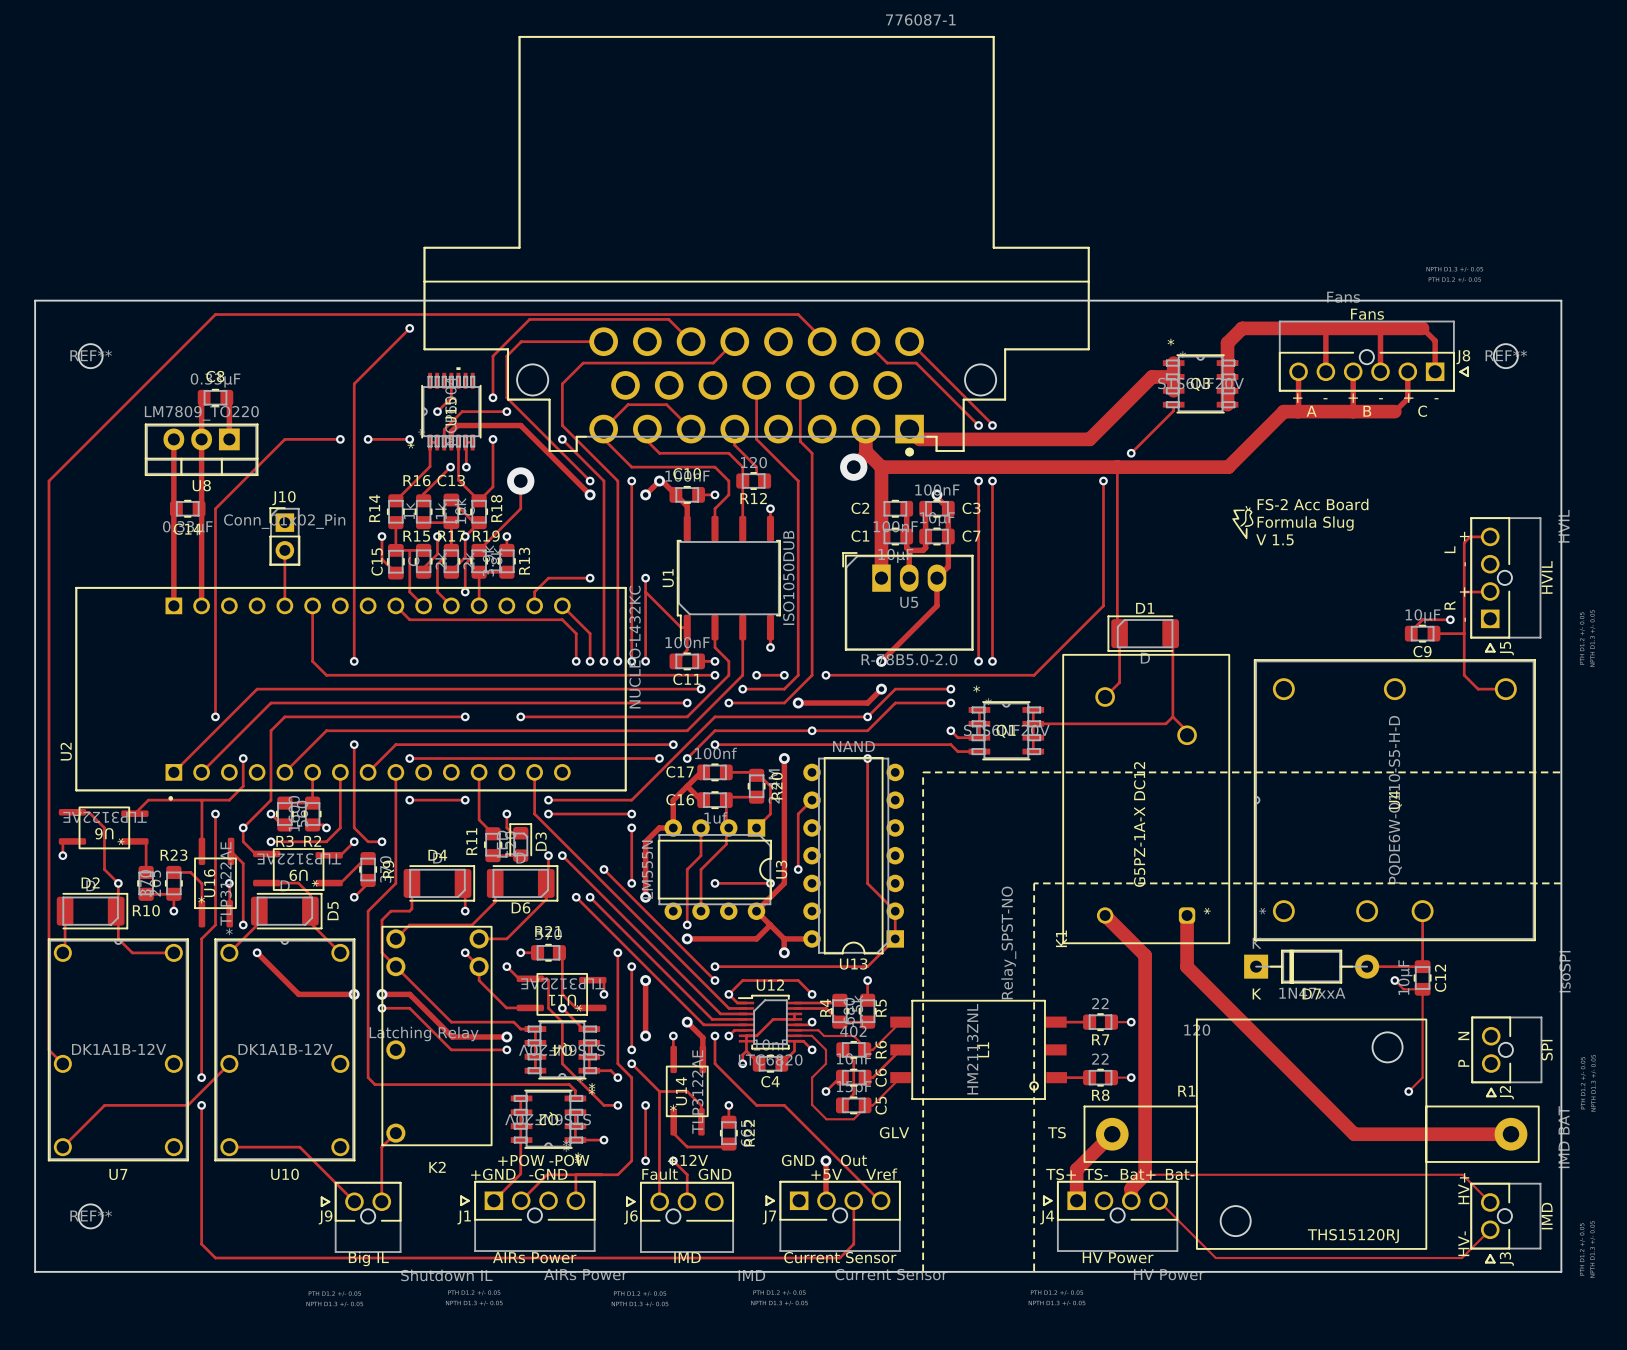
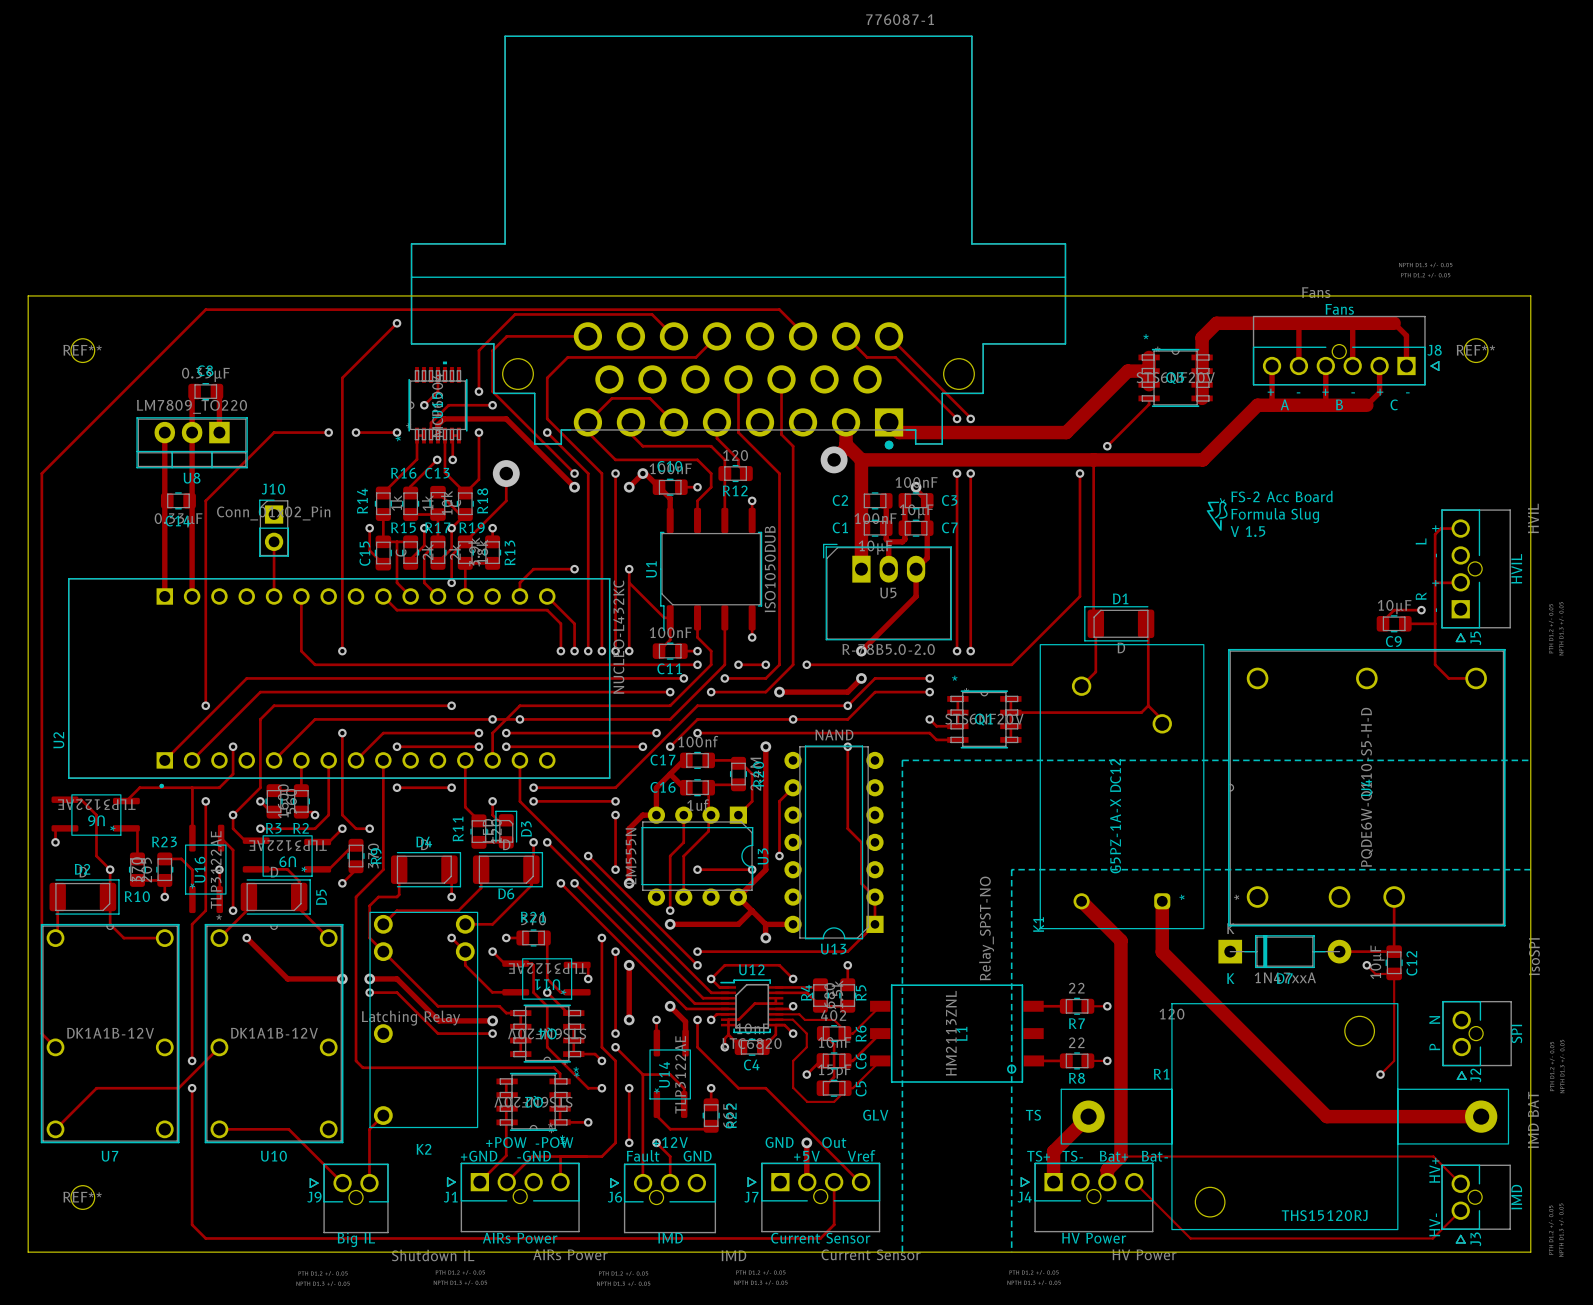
track: (520, 716) (534, 716) -> (492, 760) (492, 733) (519, 705)
via: (520, 716) -> none
via: none -> (492, 719)
via: none -> (519, 719)
track: (492, 744) (520, 744) -> none
via: none -> (478, 733)
via: none -> (506, 733)
track: (492, 758) (520, 758) -> none
via: none -> (478, 746)
via: none -> (506, 746)
track: (867, 841) (867, 883) (881, 897) -> (847, 828) (861, 842) (861, 883)

